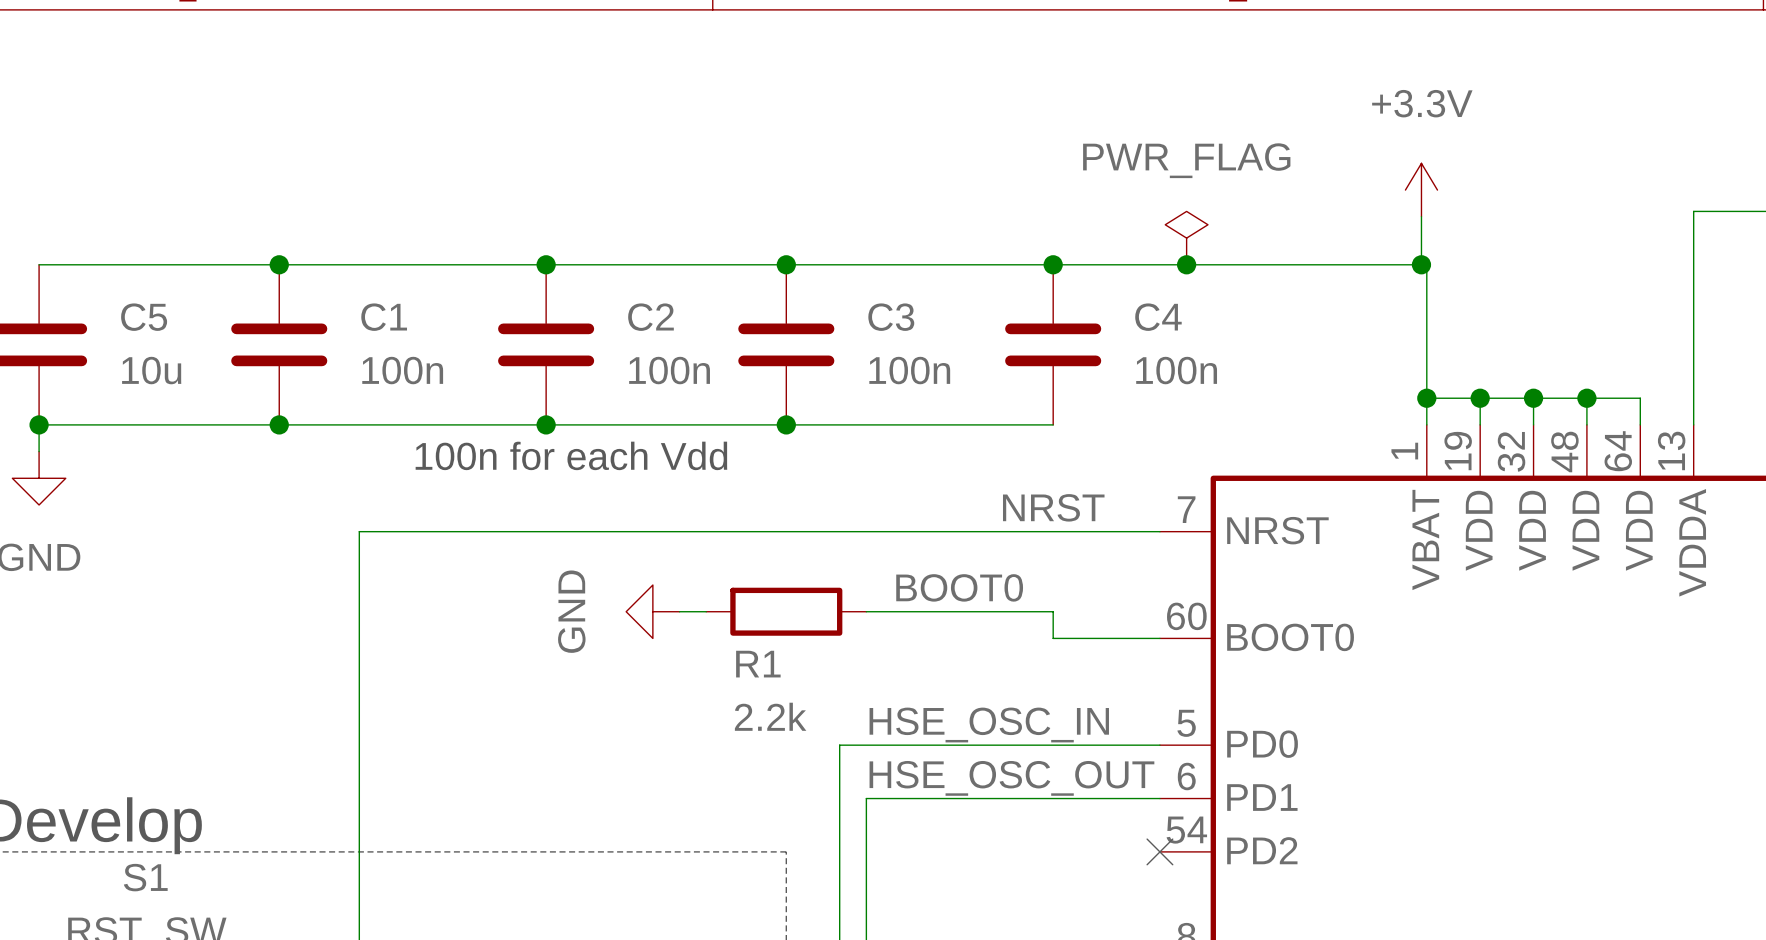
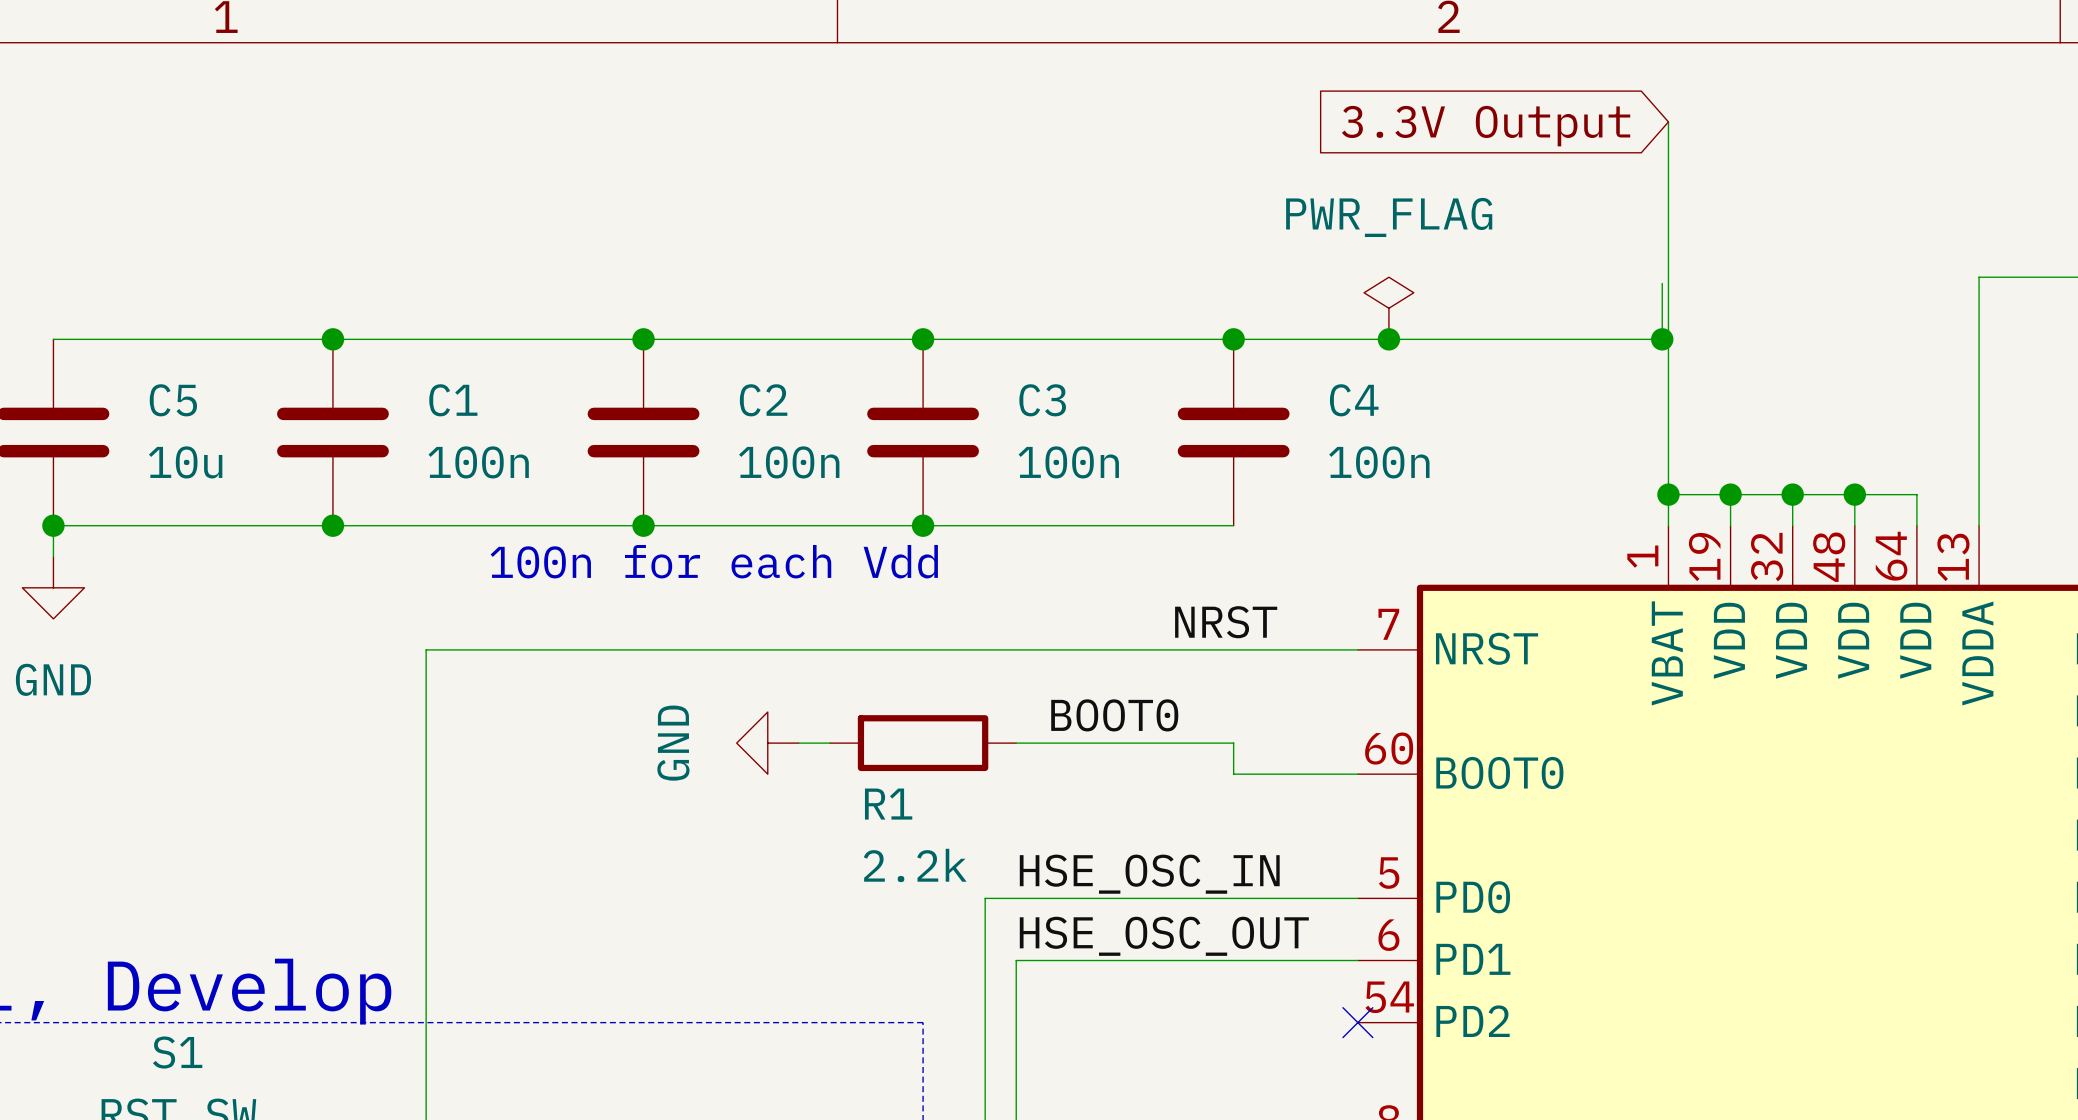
wire: none -> (1668, 121) (1668, 339)
global label: none -> 3.3V Output (1486, 126)
power symbol: +3.3V (1421, 190) -> none

